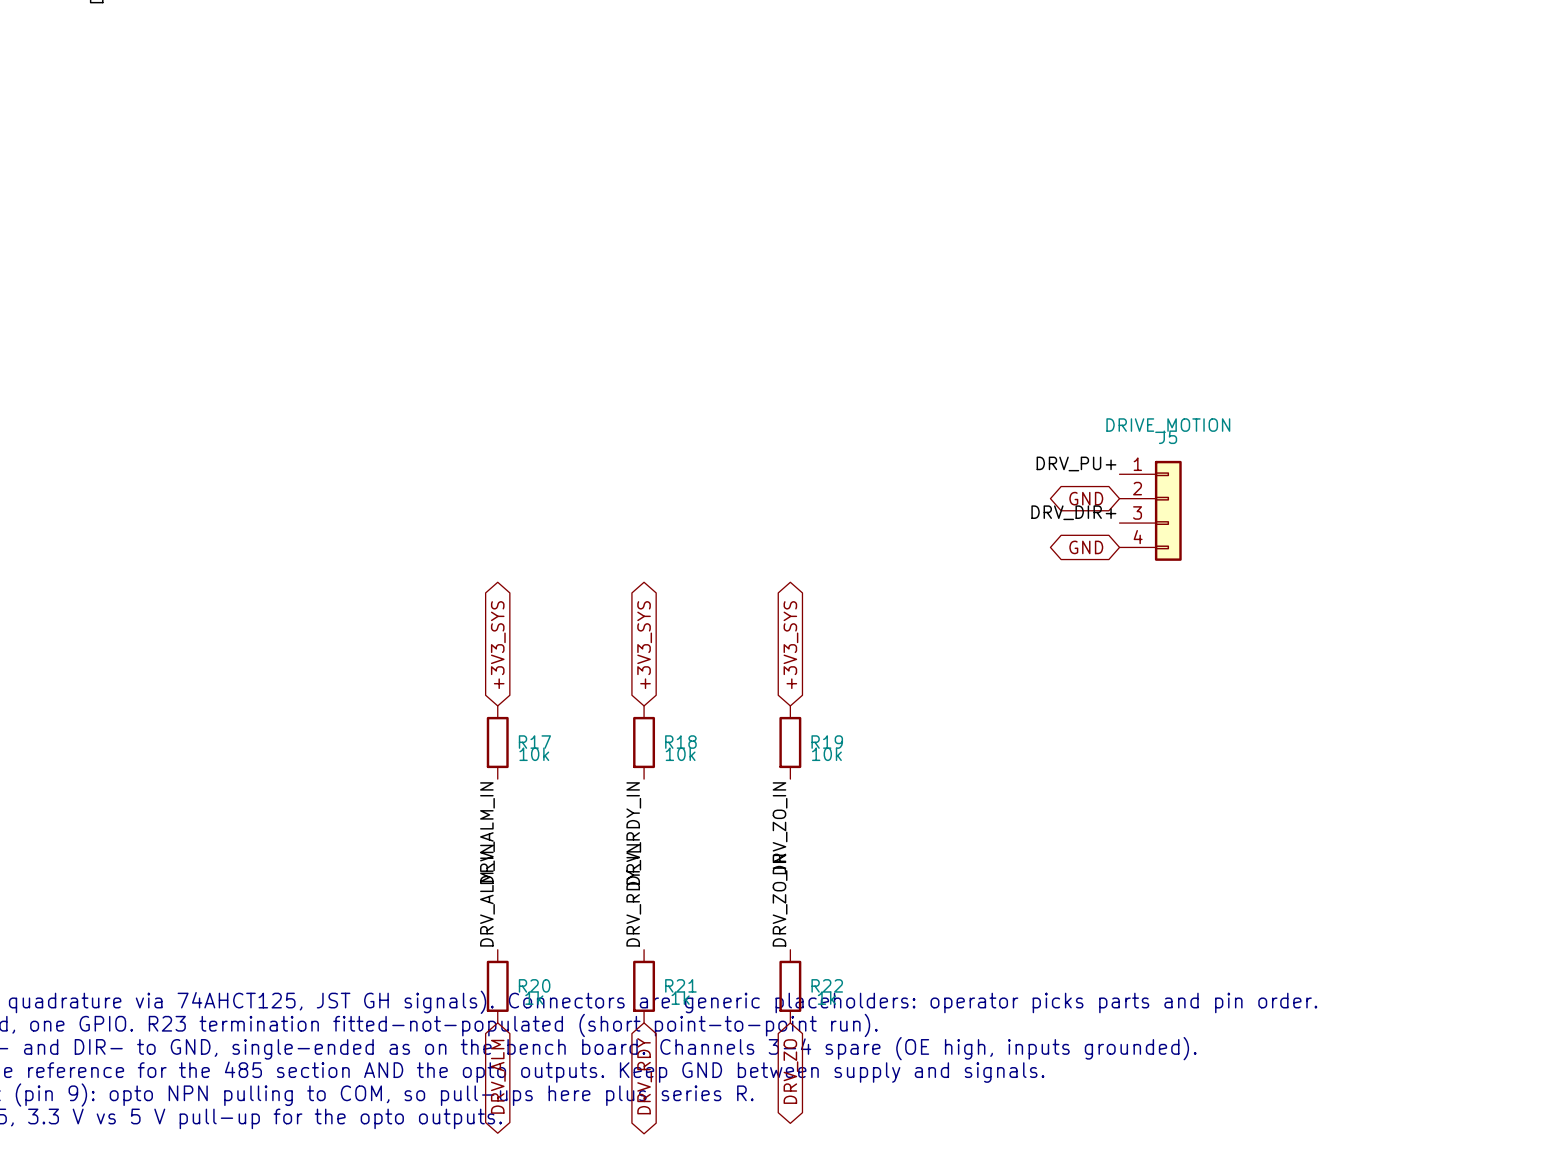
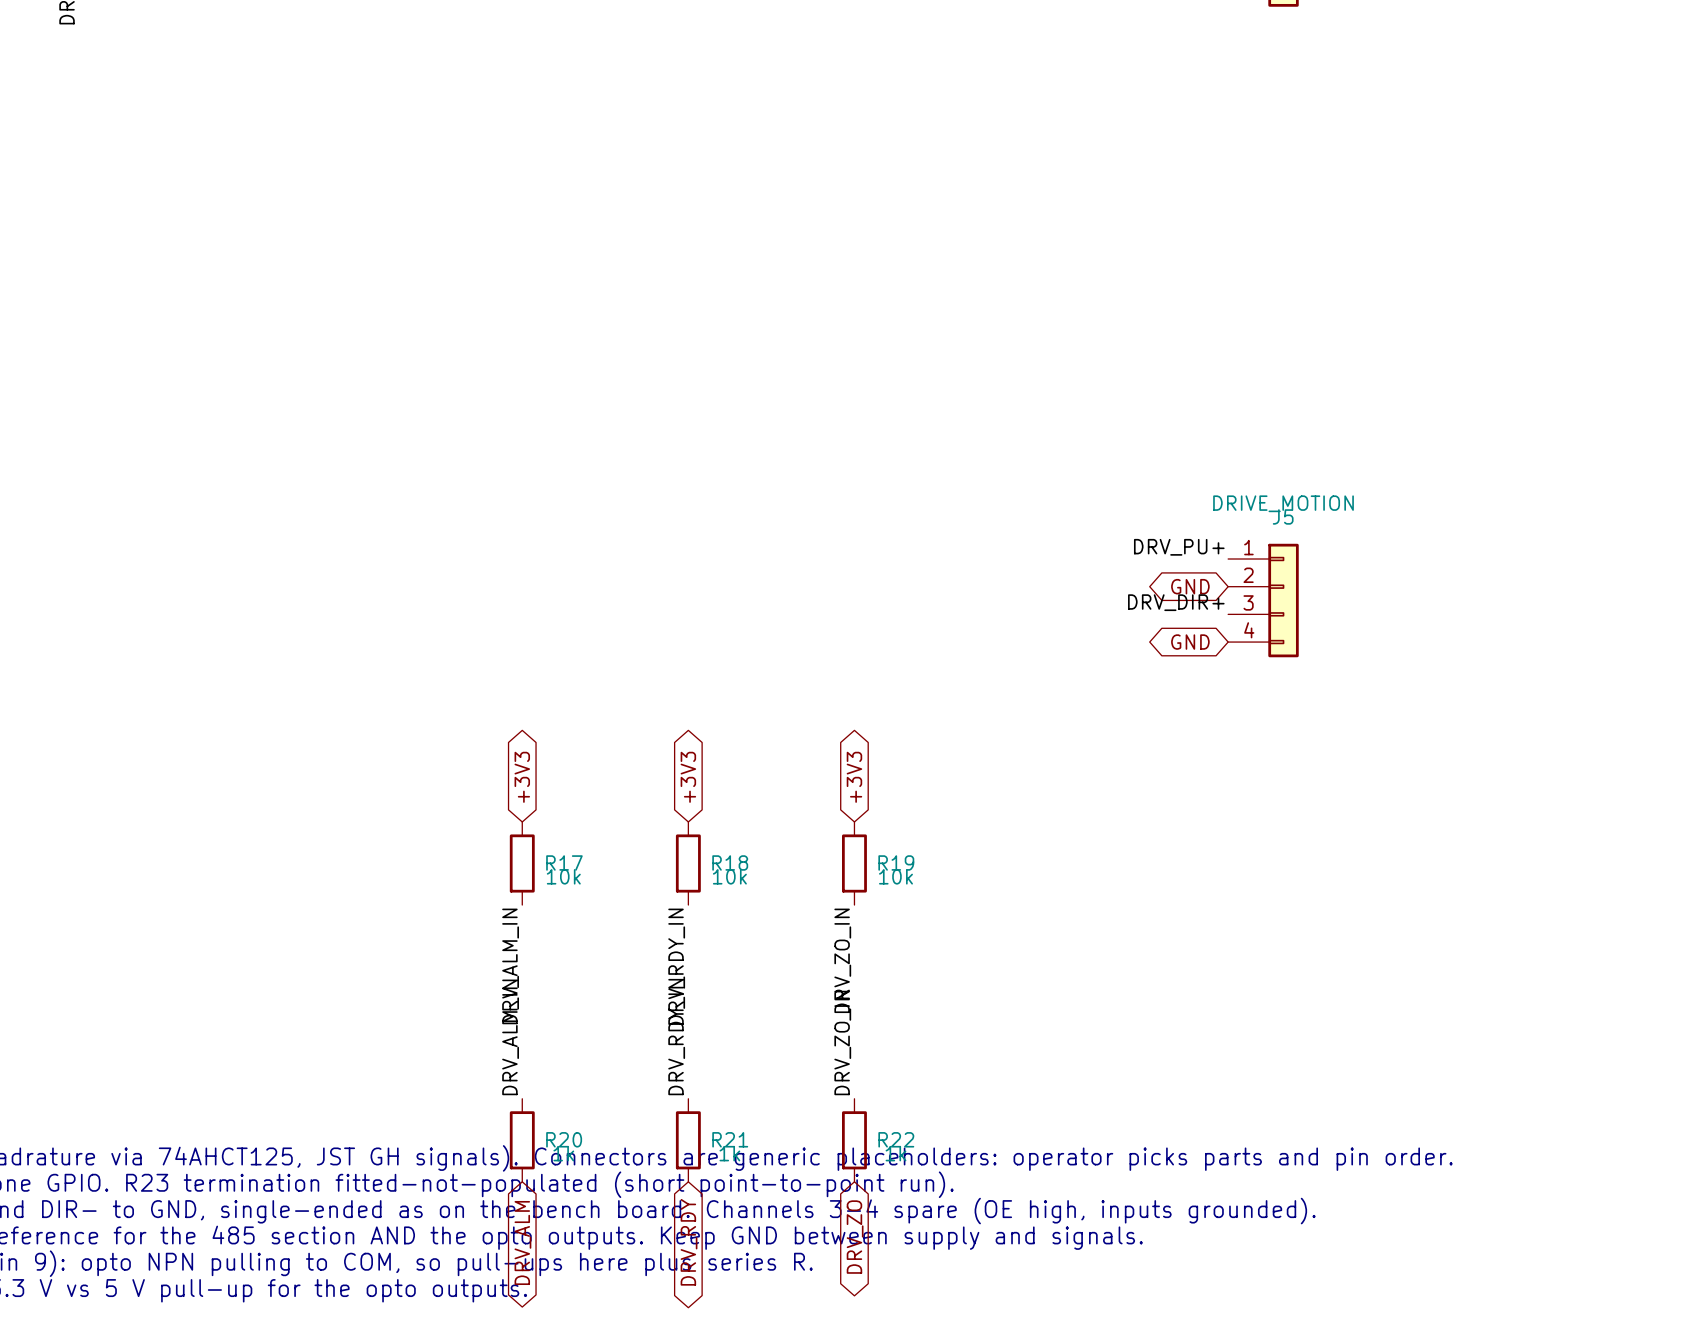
global label: +3V3_SYS (498, 645) -> +3V3 (522, 777)
global label: +3V3_SYS (644, 645) -> +3V3 (688, 777)
global label: +3V3_SYS (790, 645) -> +3V3 (854, 777)

